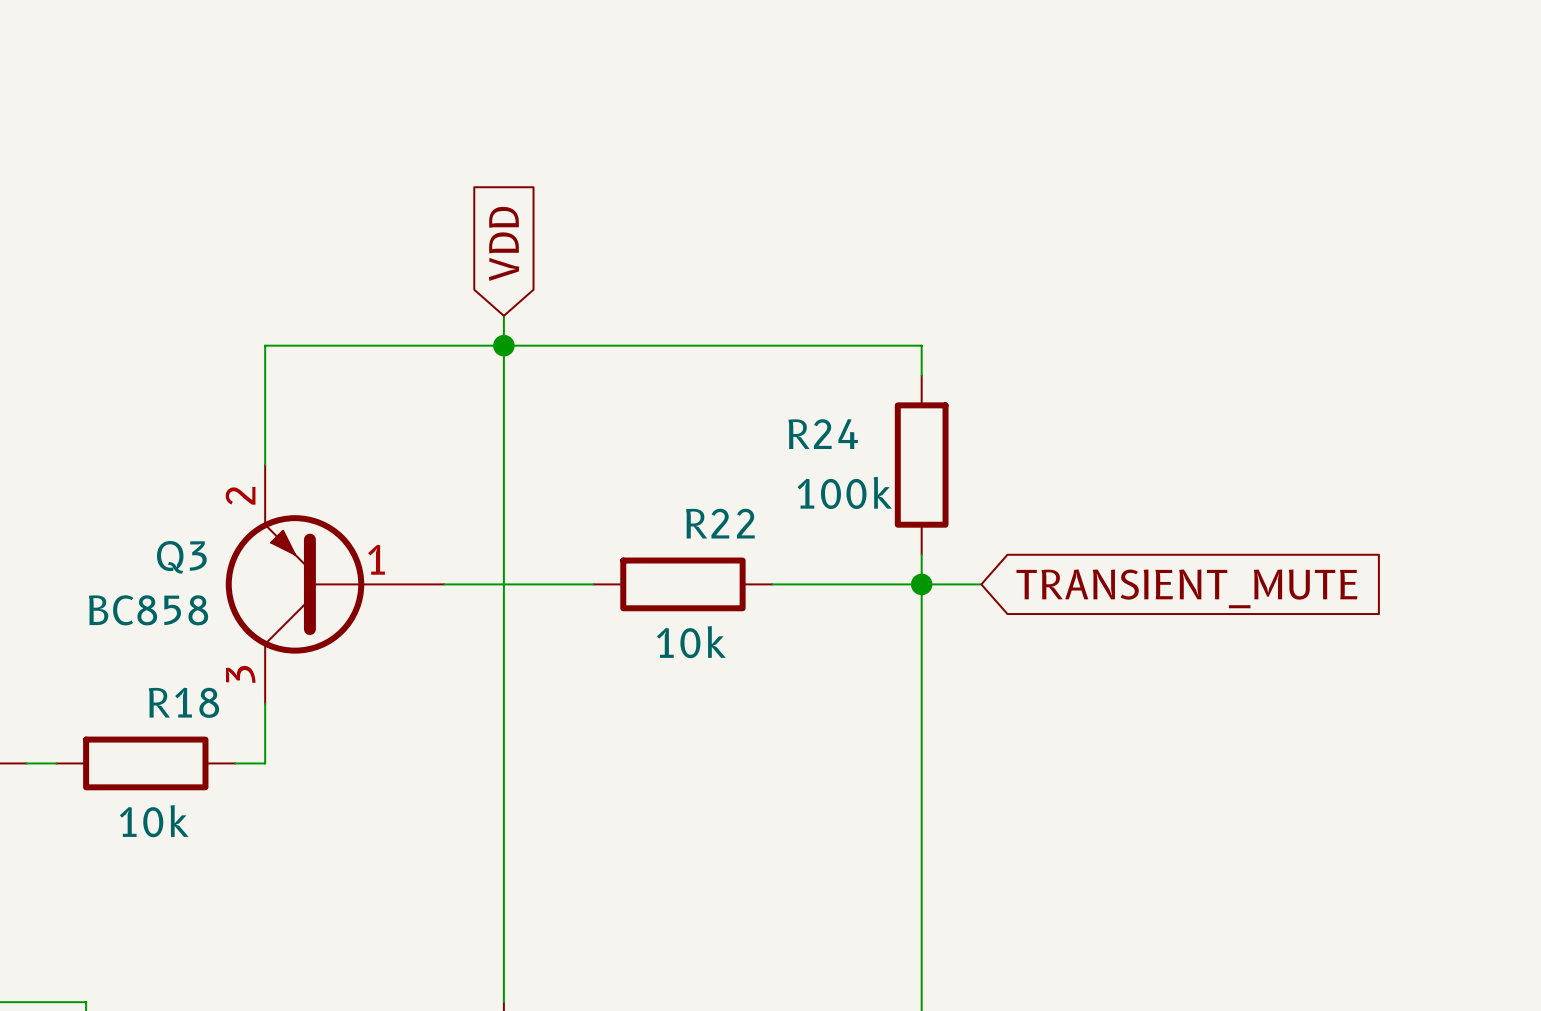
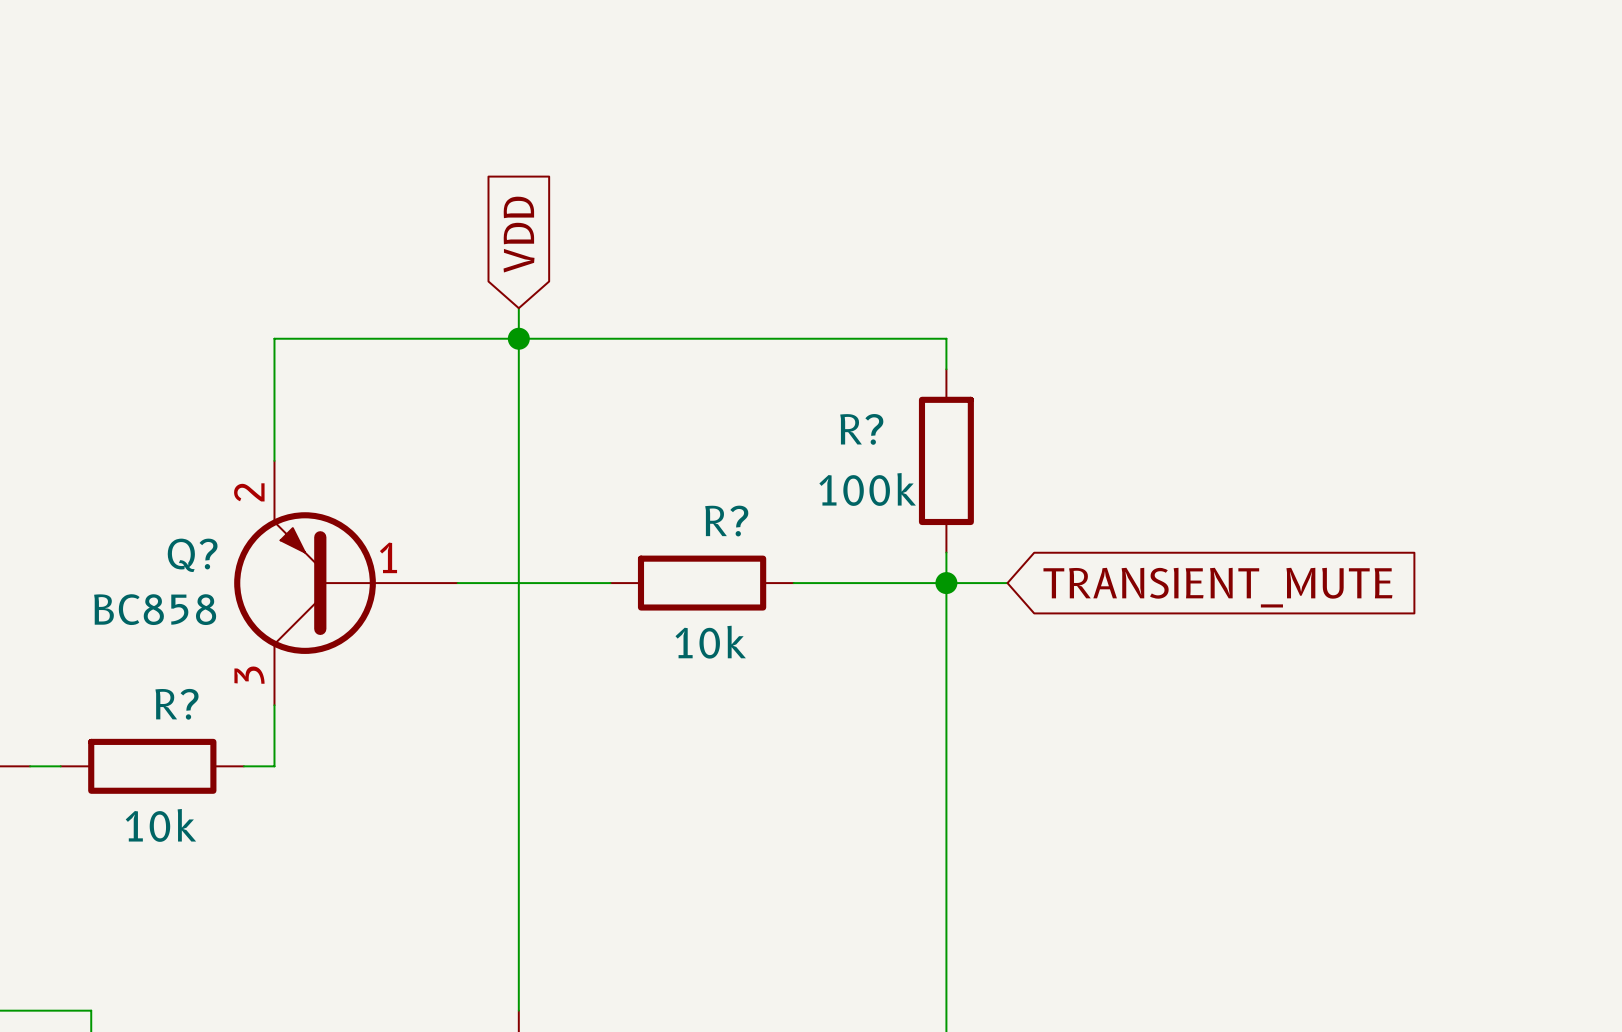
R24 name: R24 (823, 434) -> R? (861, 429)
R22 name: R22 (720, 523) -> R? (726, 521)
Q3 name: Q3 (181, 557) -> Q? (192, 555)
R18 name: R18 (183, 702) -> R? (176, 704)

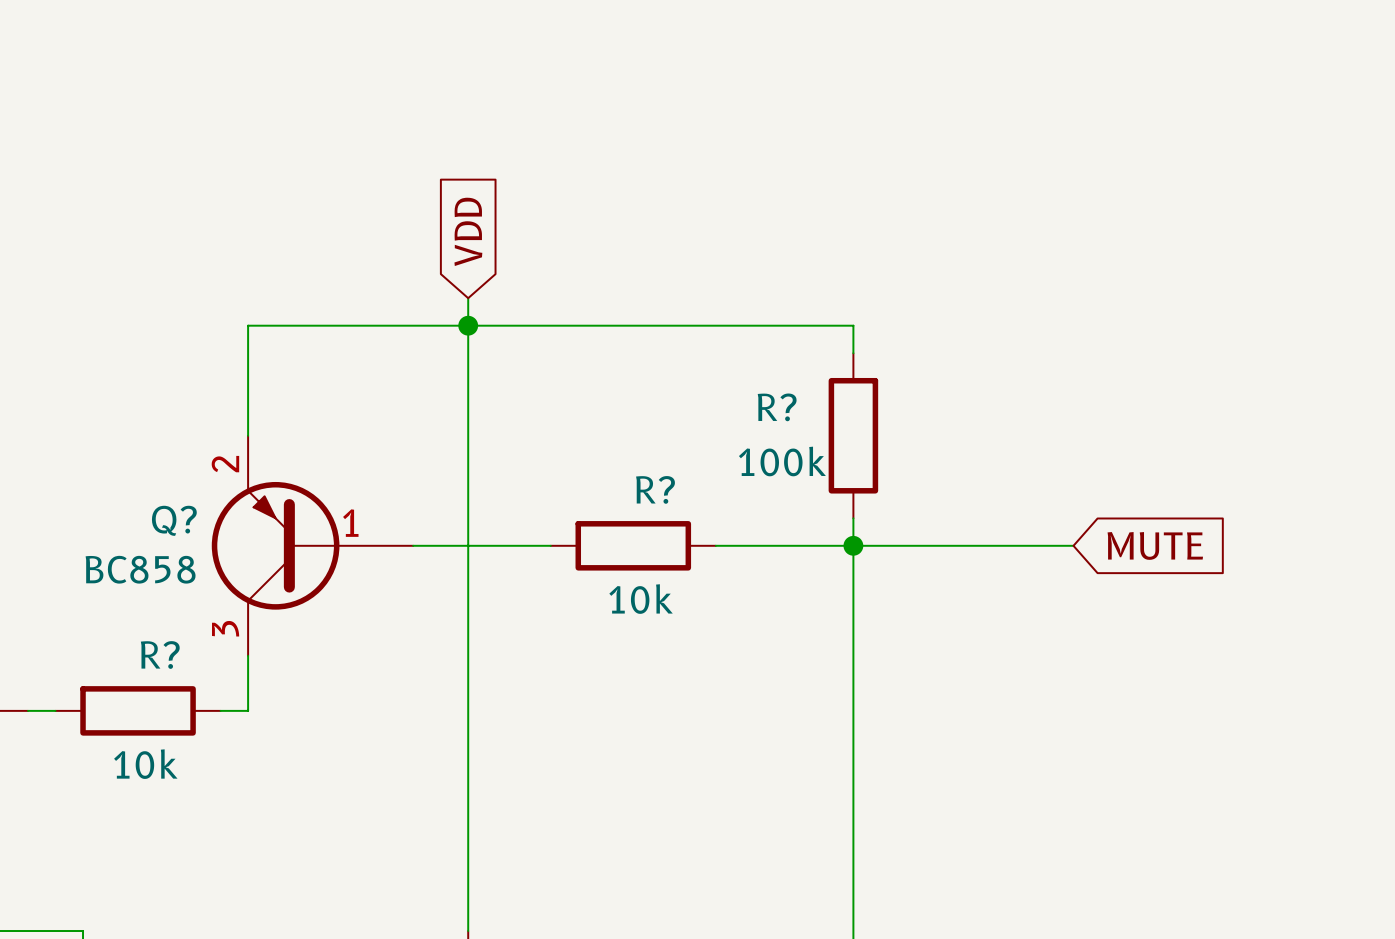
wire: none -> (908, 545) (1073, 545)
global label: none -> MUTE (1155, 545)
global label: TRANSIENT_MUTE (1217, 587) -> none

